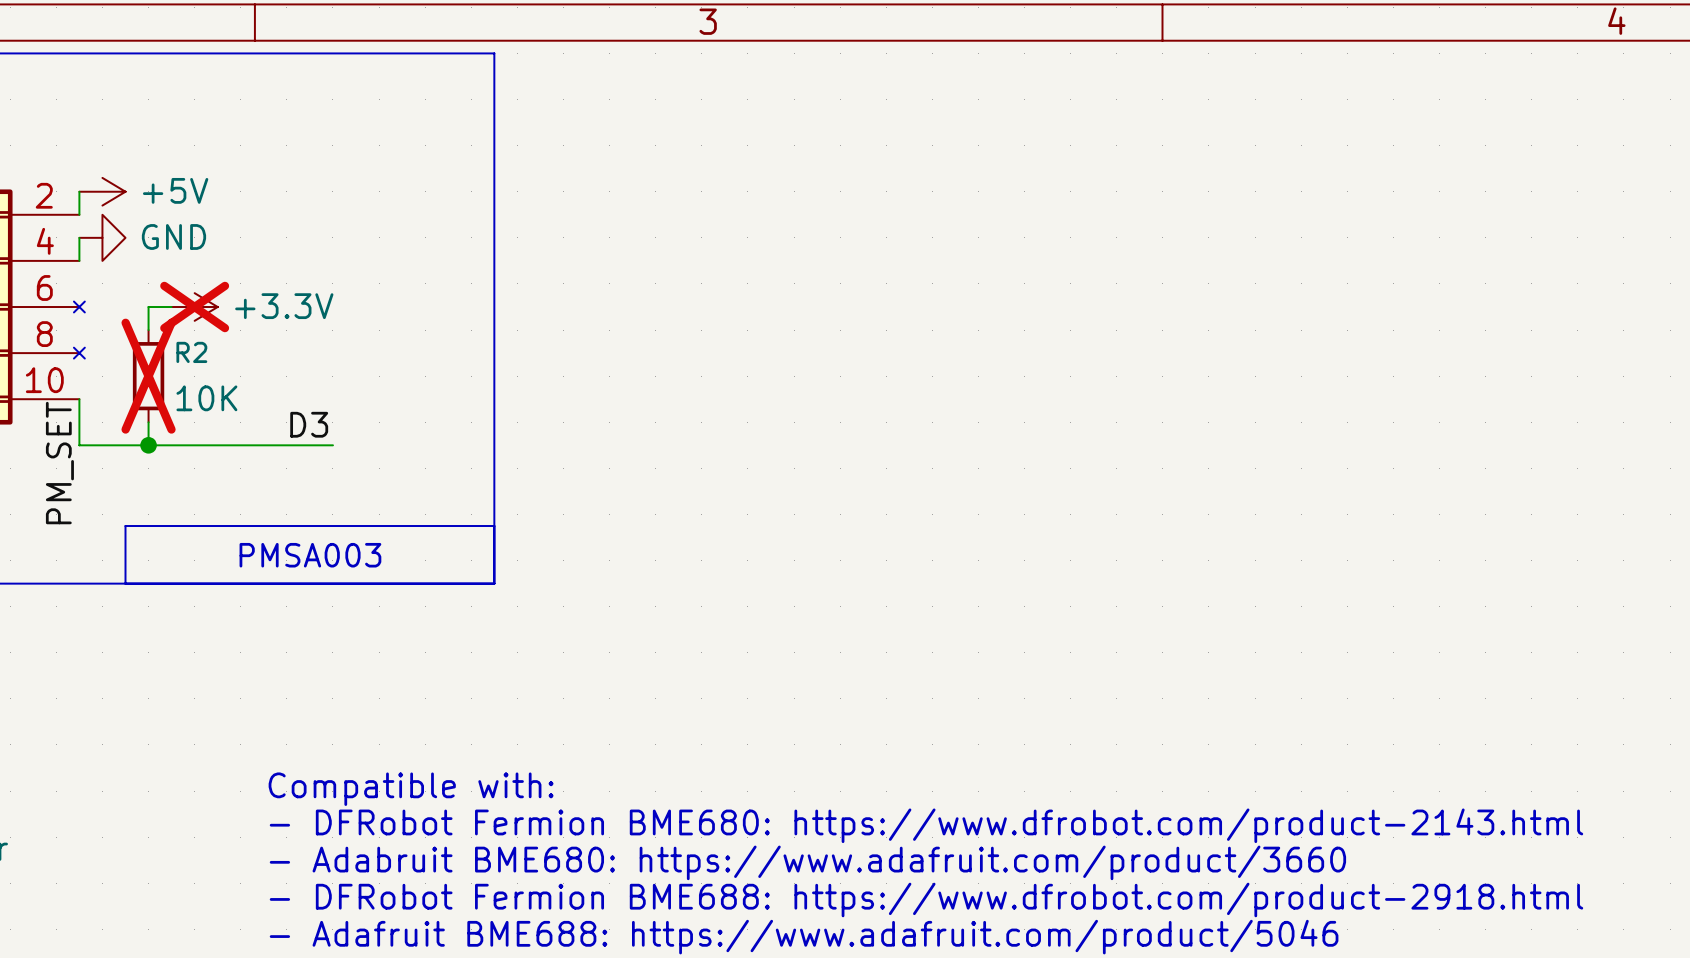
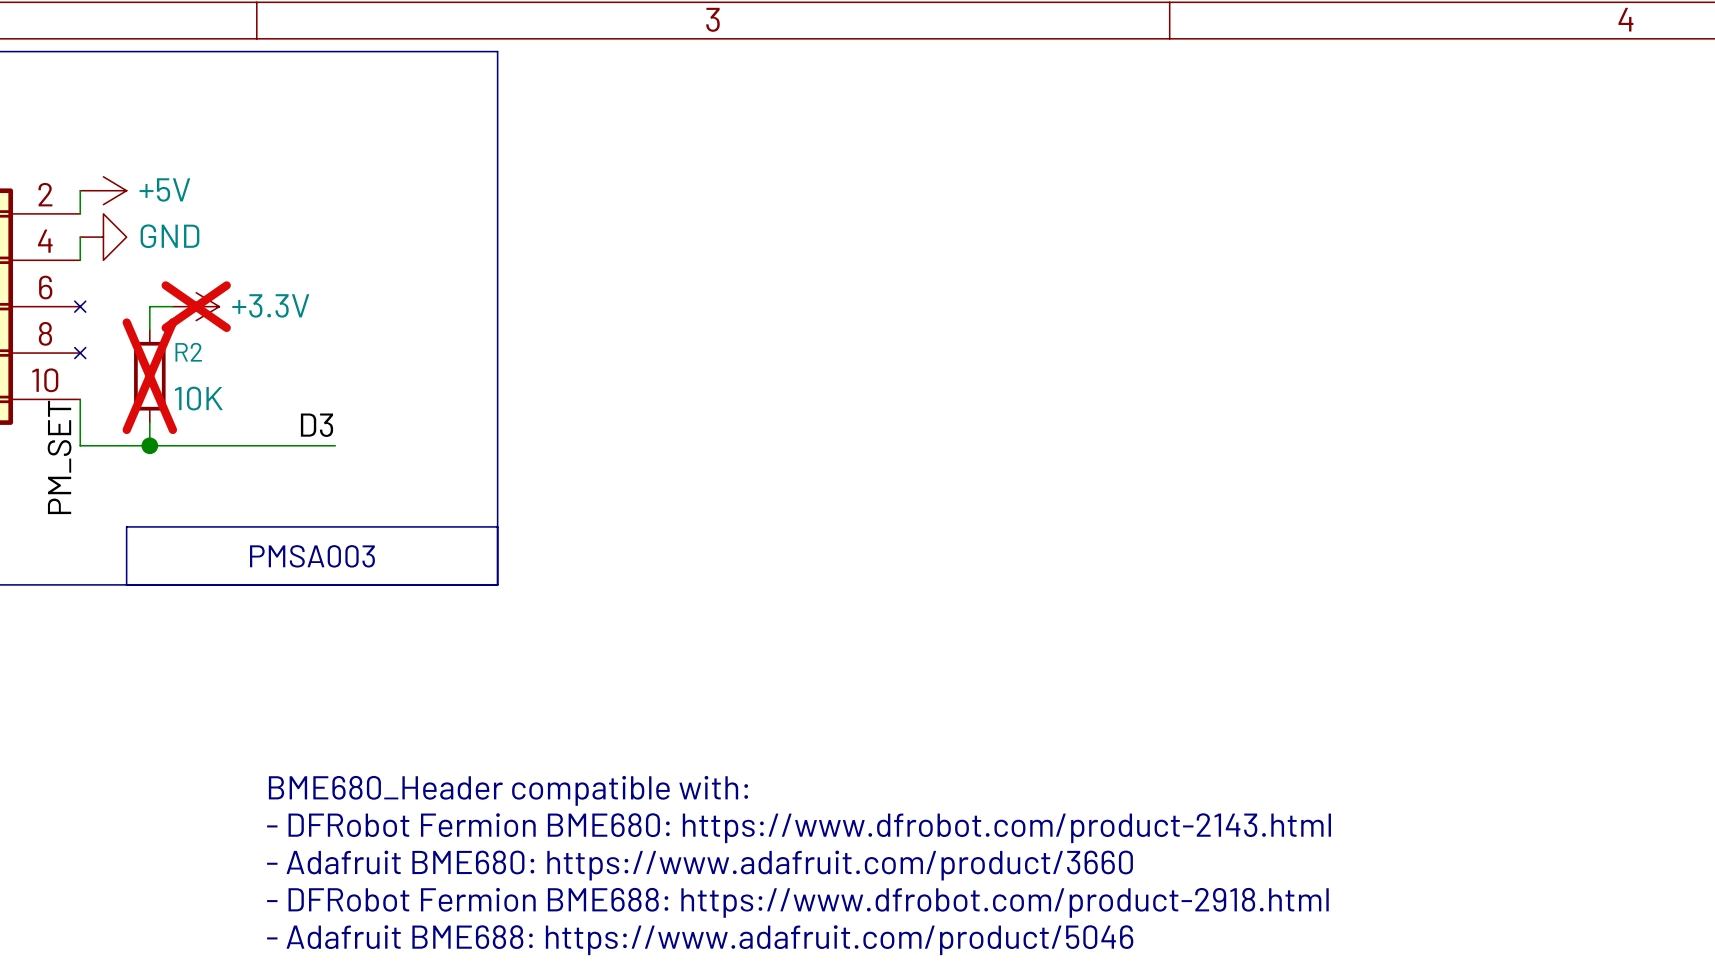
text: Compatible with: (411, 789) -> BME680_Header compatible with: (508, 790)
text: - Adabruit BME680: https://www.adafruit.com/product/3660 (807, 862) -> - Adafruit BME680: https://www.adafruit.com/product/3660 (699, 865)

